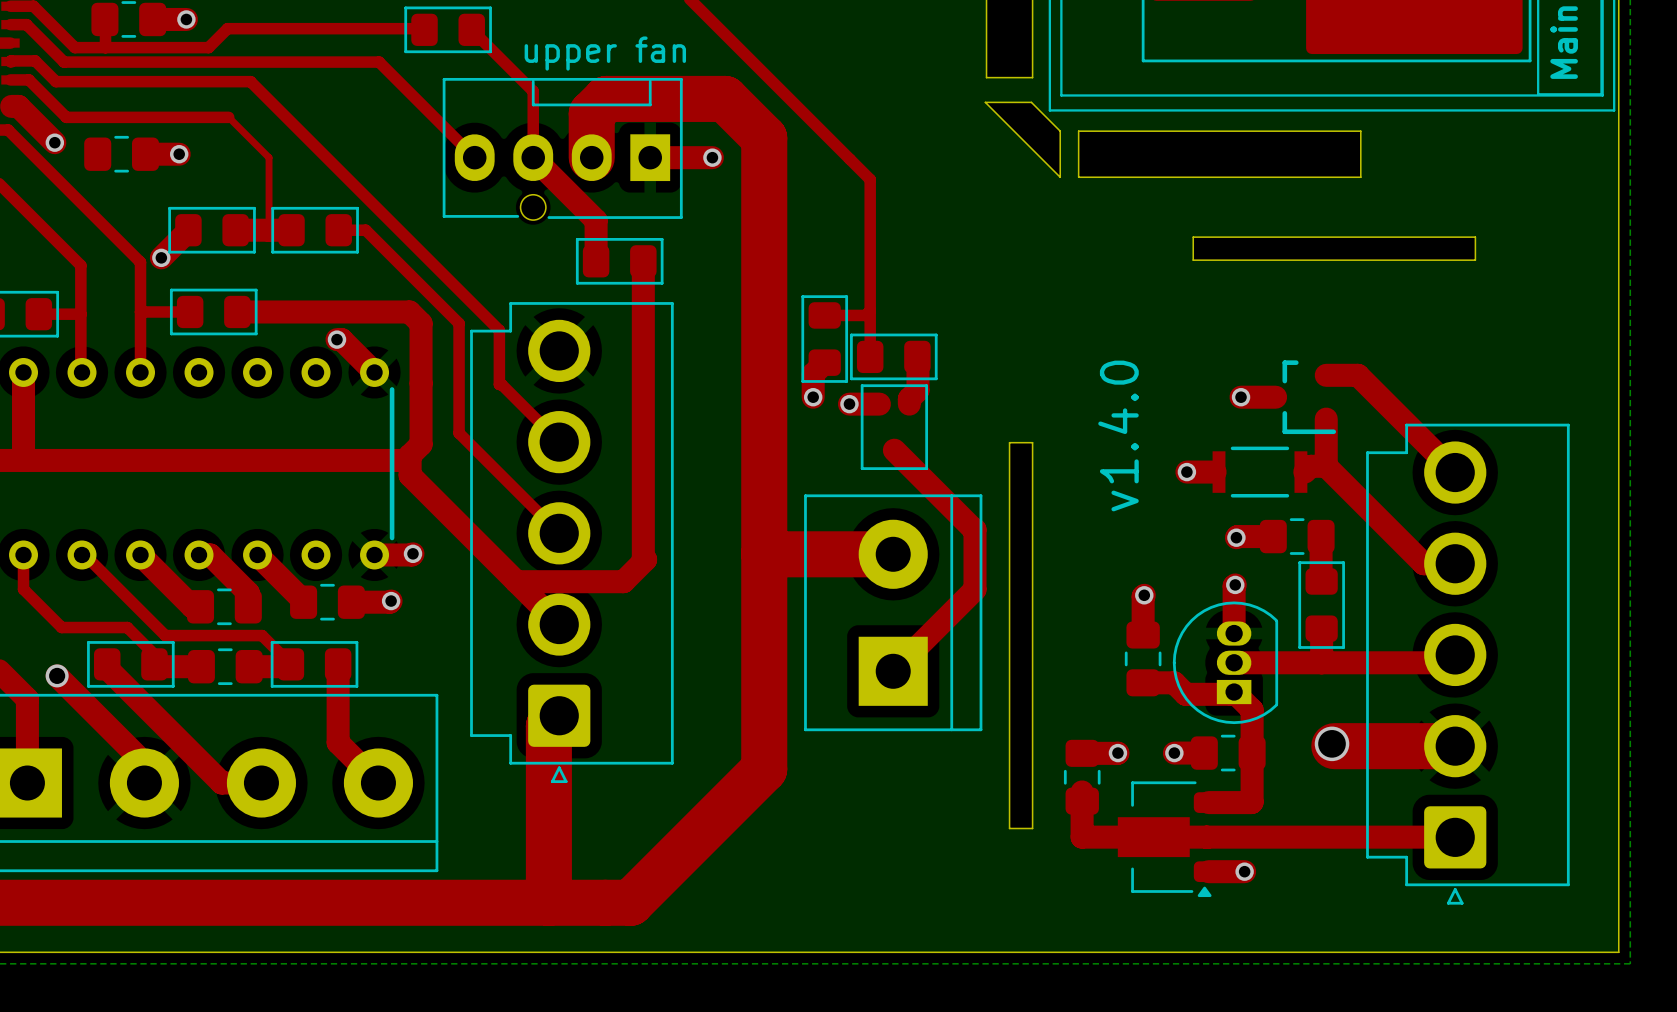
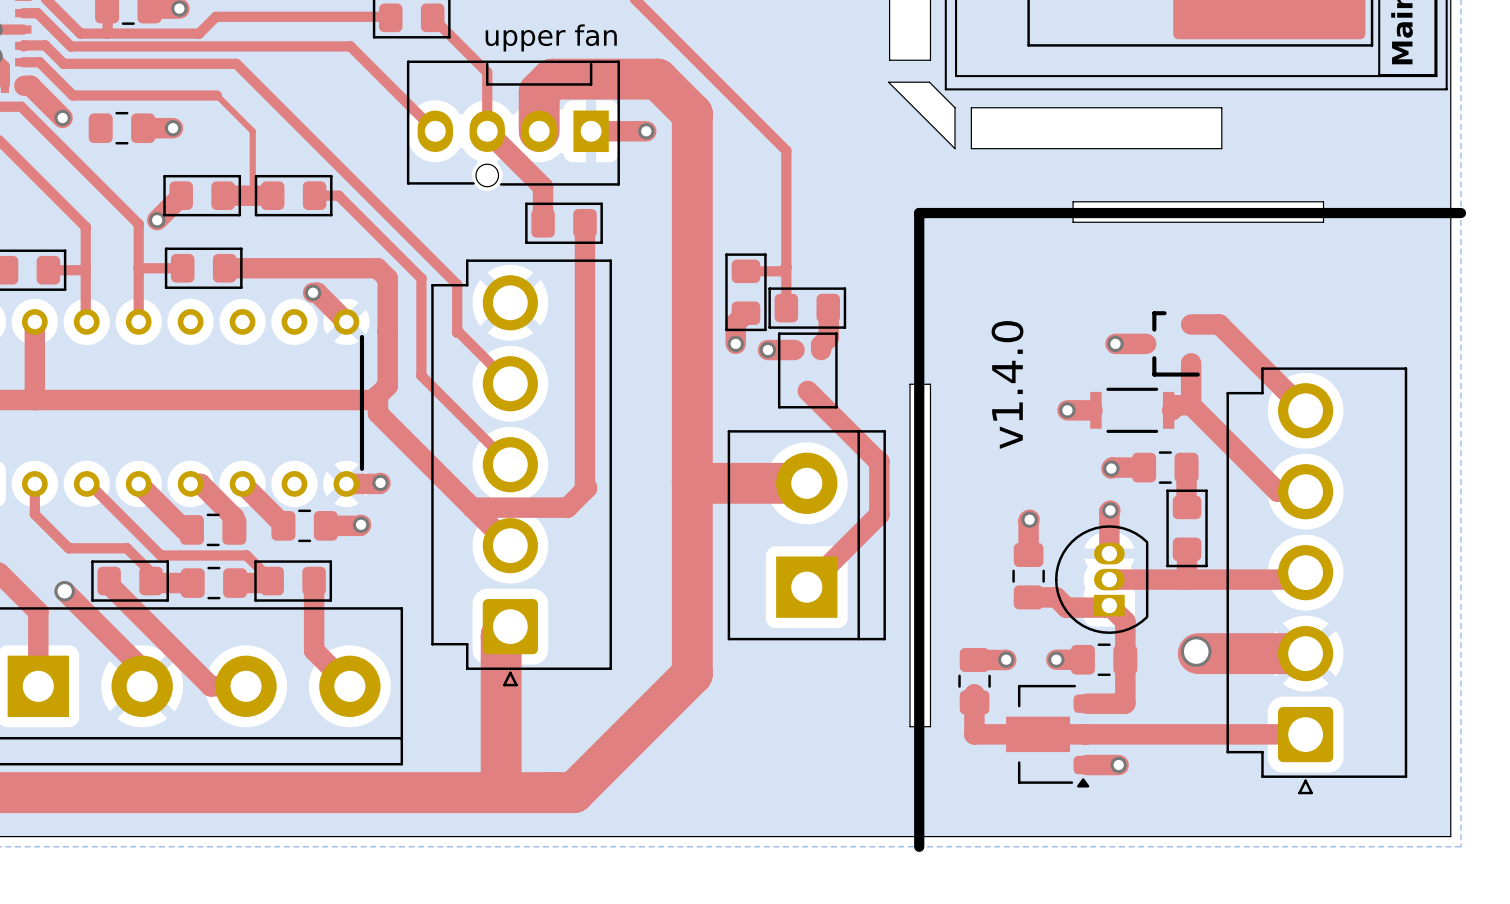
line: none -> (1460, 213) (919, 213) (919, 846)

